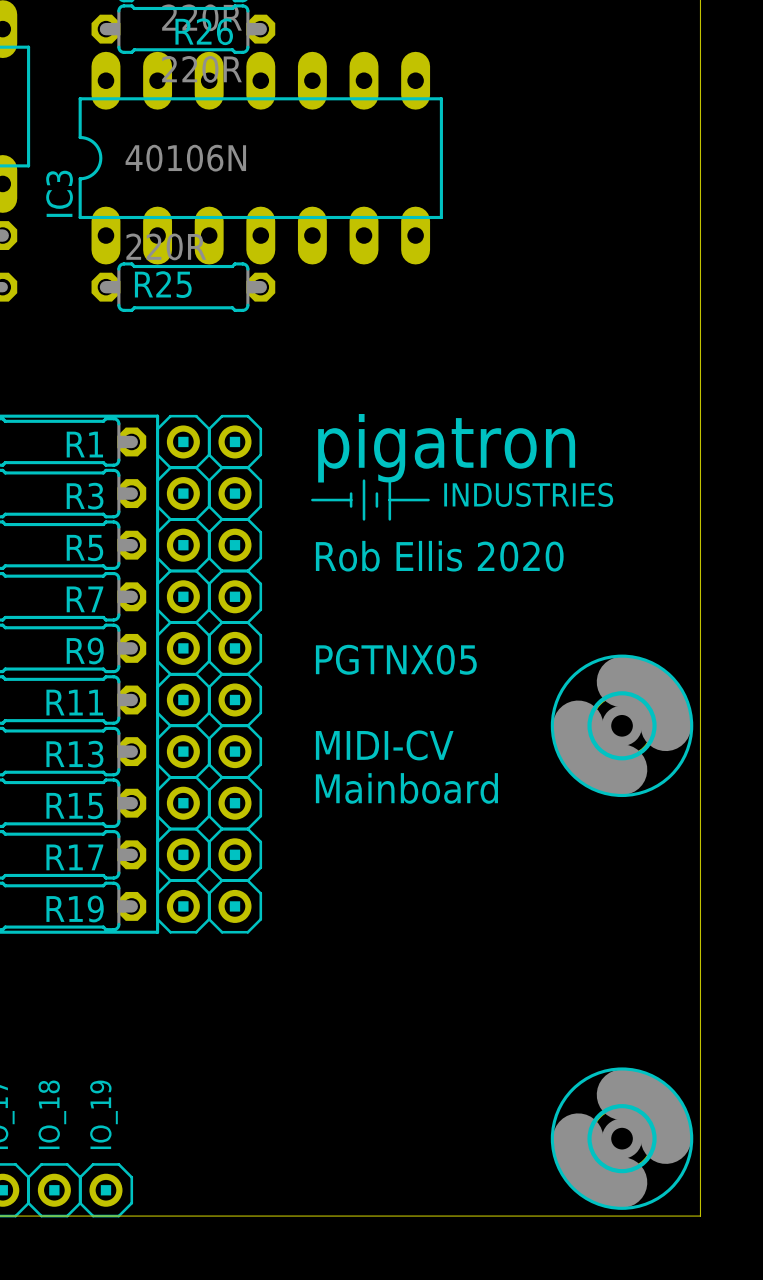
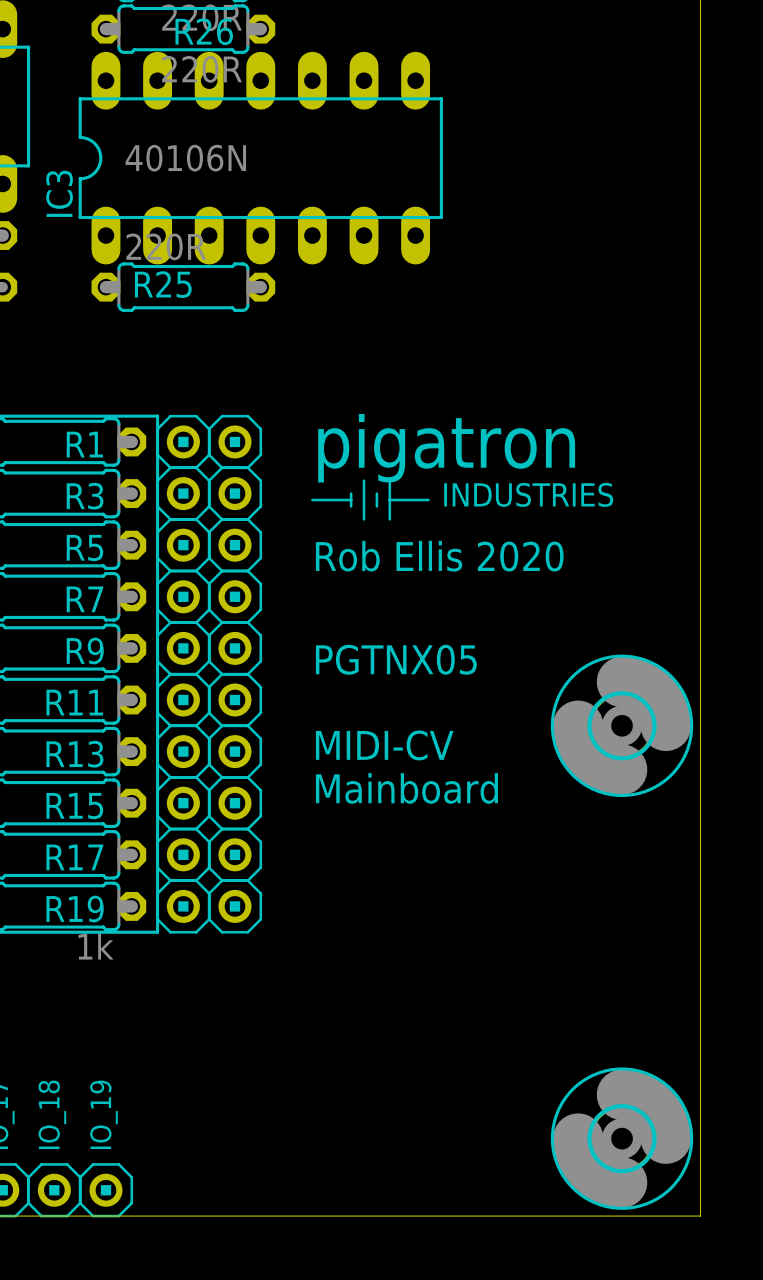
R19 value: none -> 1k (96, 946)

